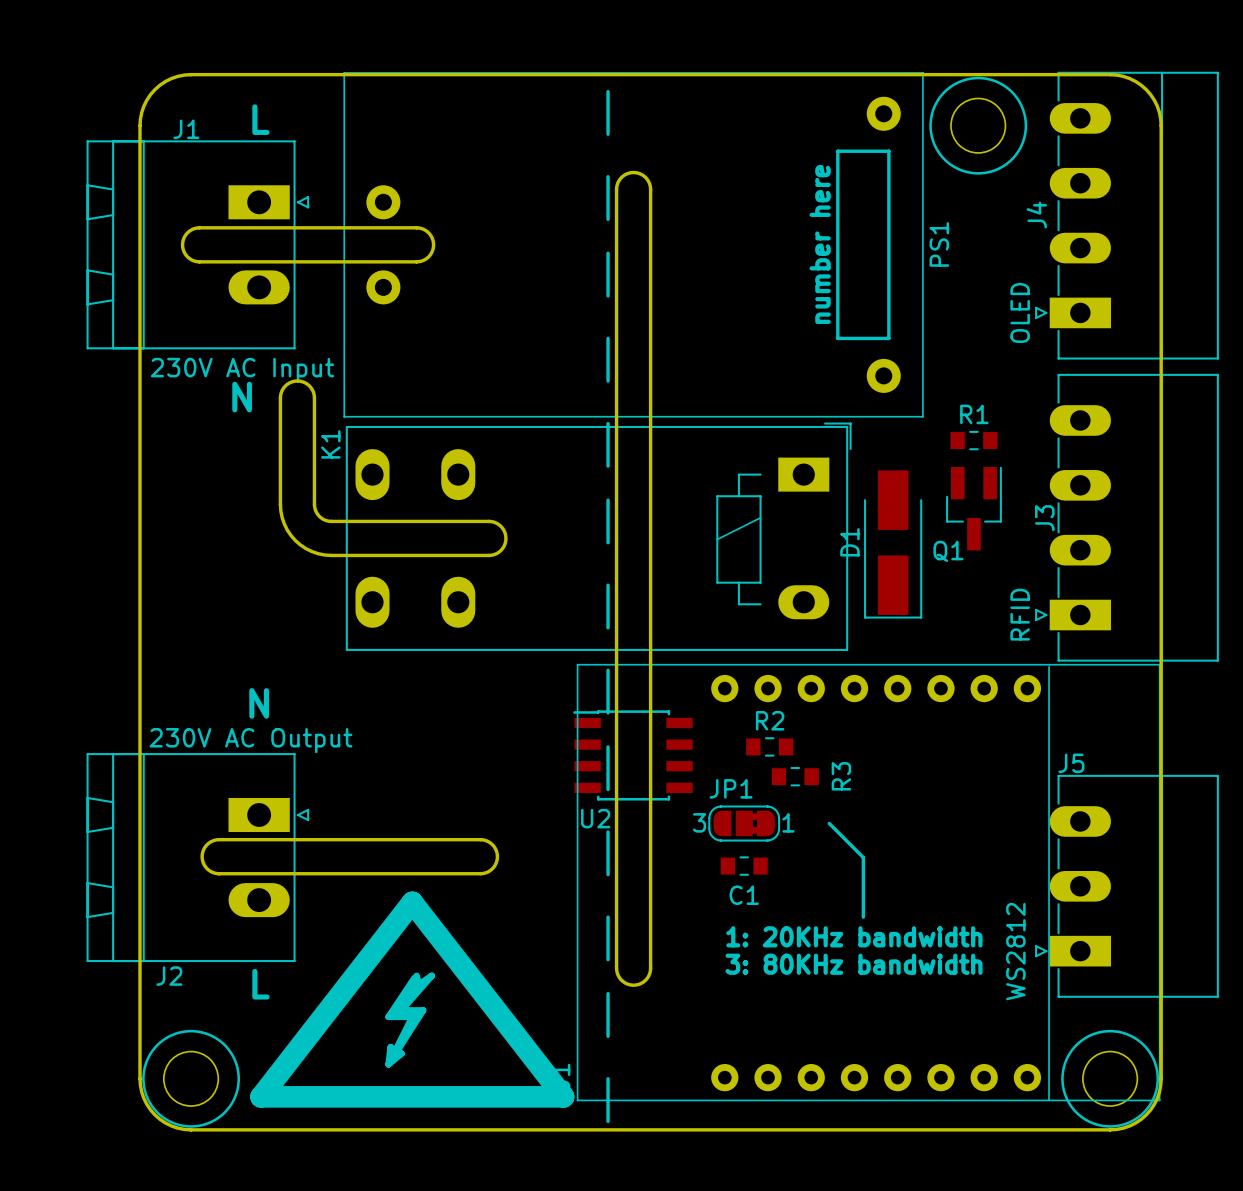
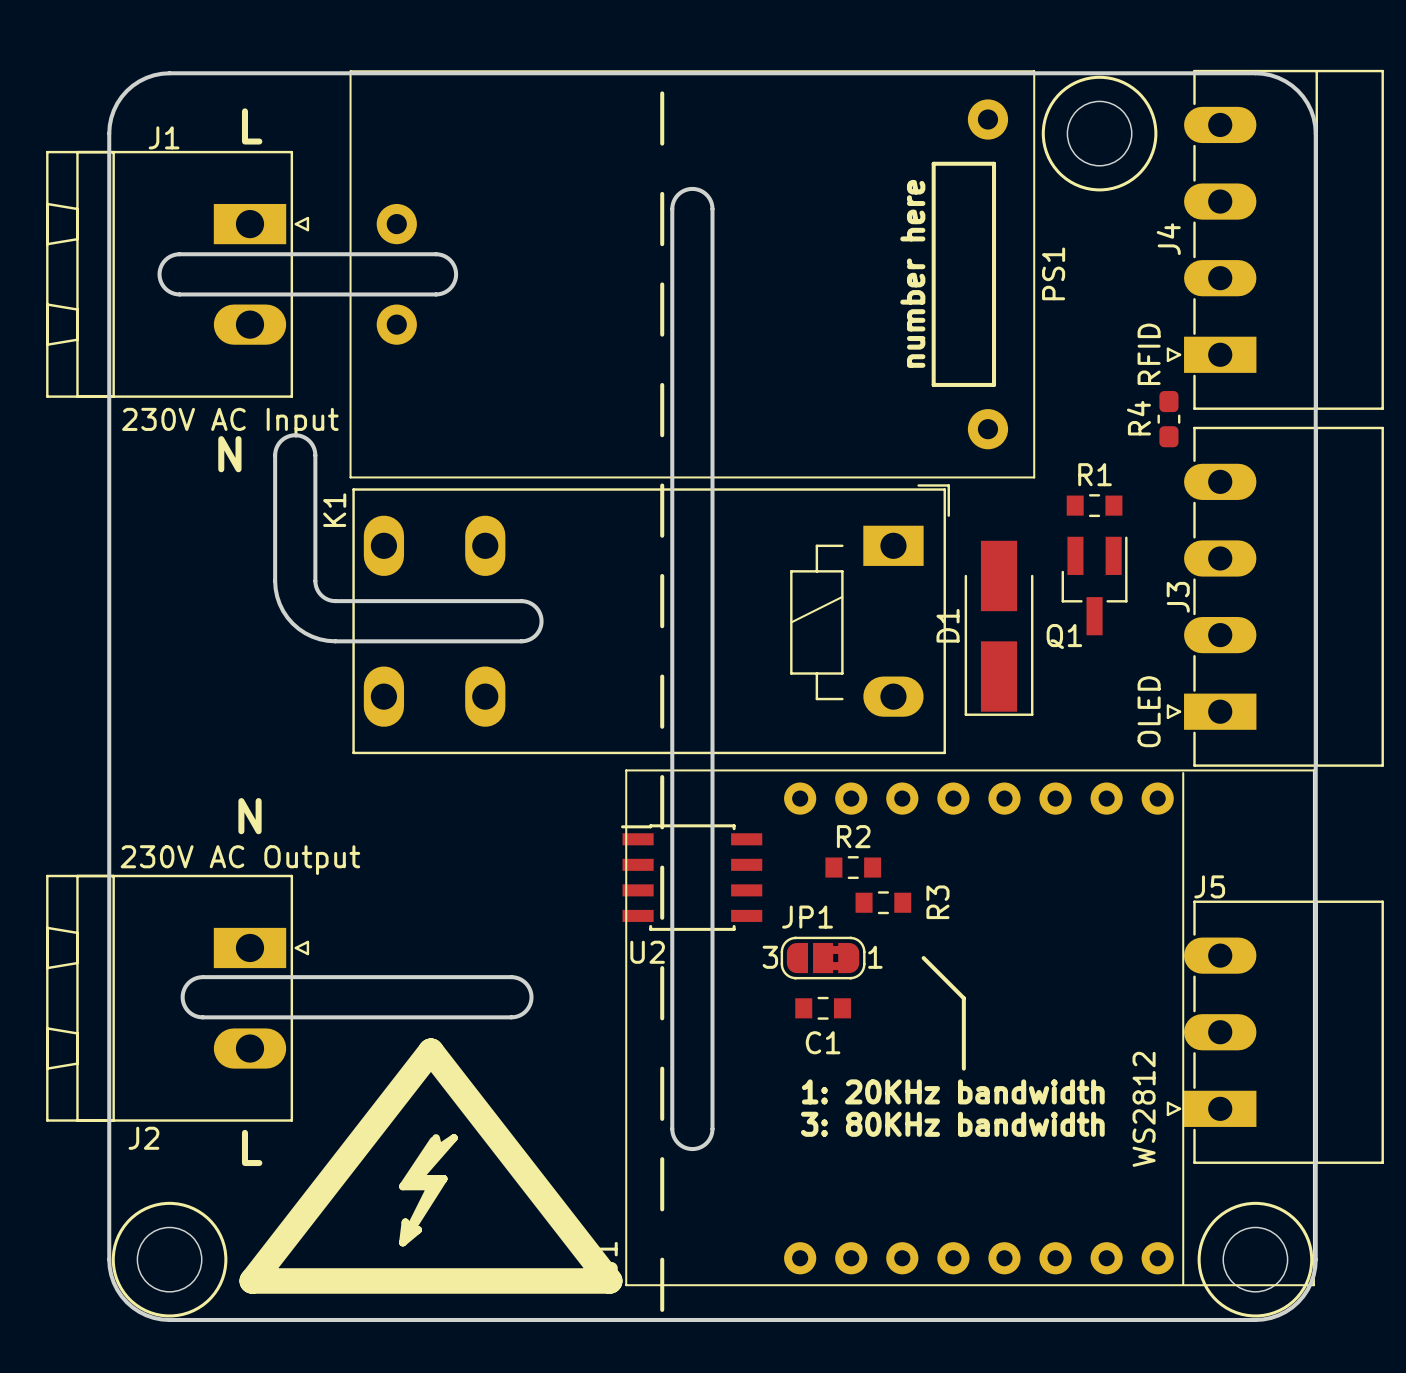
J4 value: OLED (1020, 312) -> RFID (1149, 354)
R4: none -> (1168, 419)
J3 value: RFID (1020, 614) -> OLED (1149, 711)

